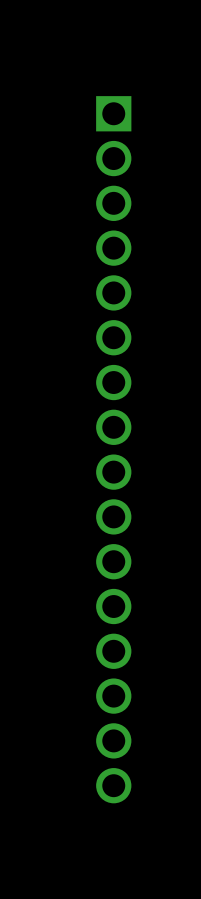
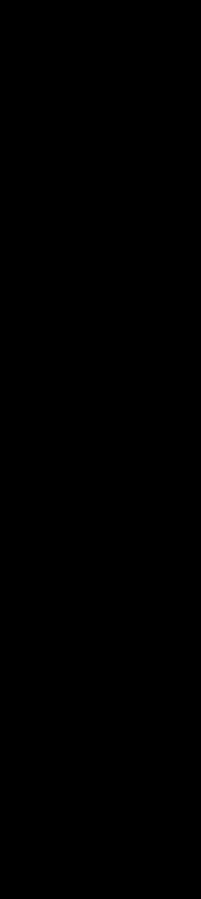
part: (113, 449) -> none

